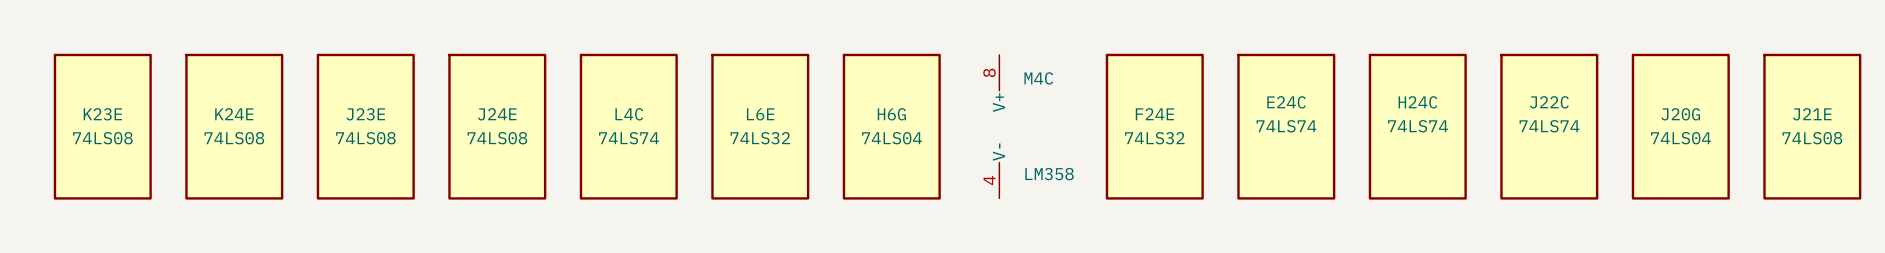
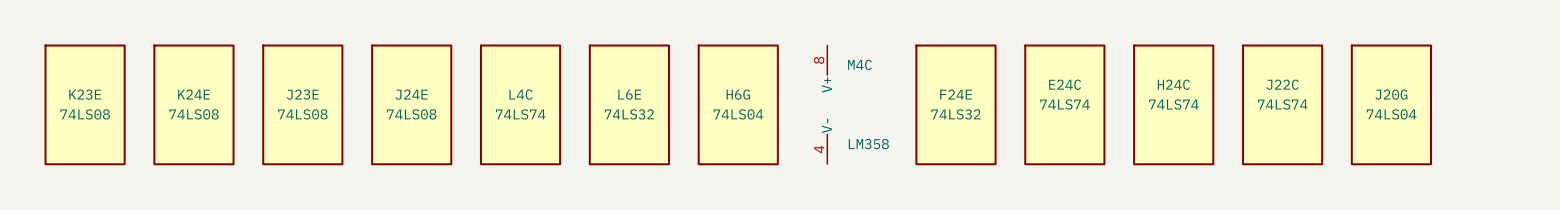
J21E: 74LS08 (1812, 126) -> none

